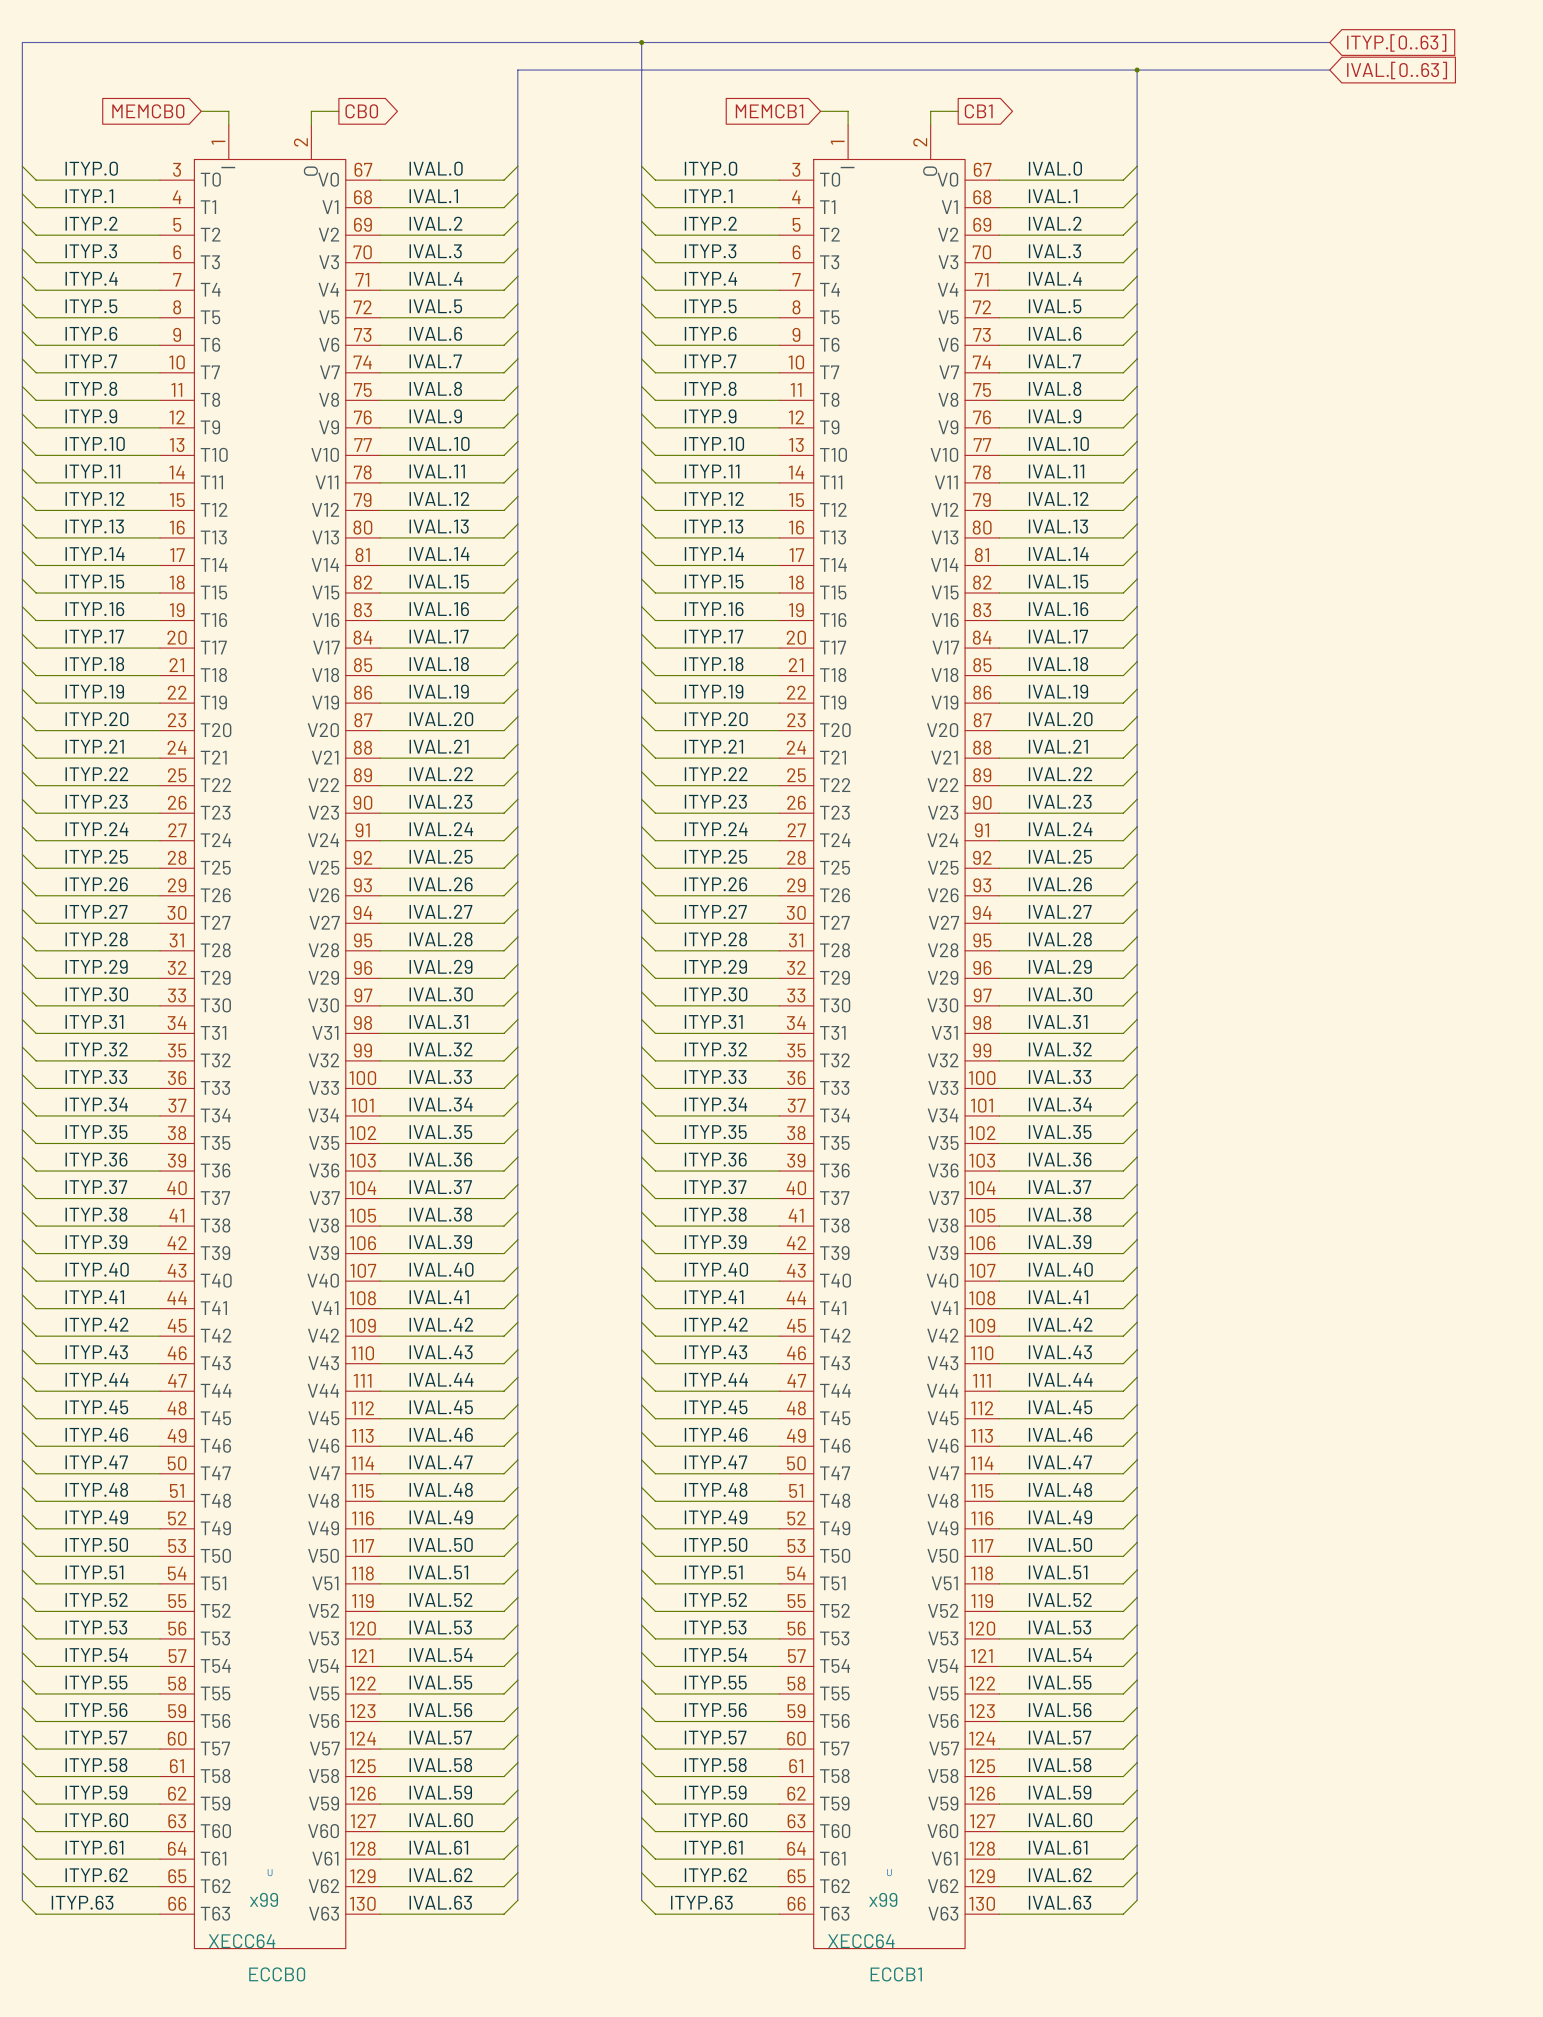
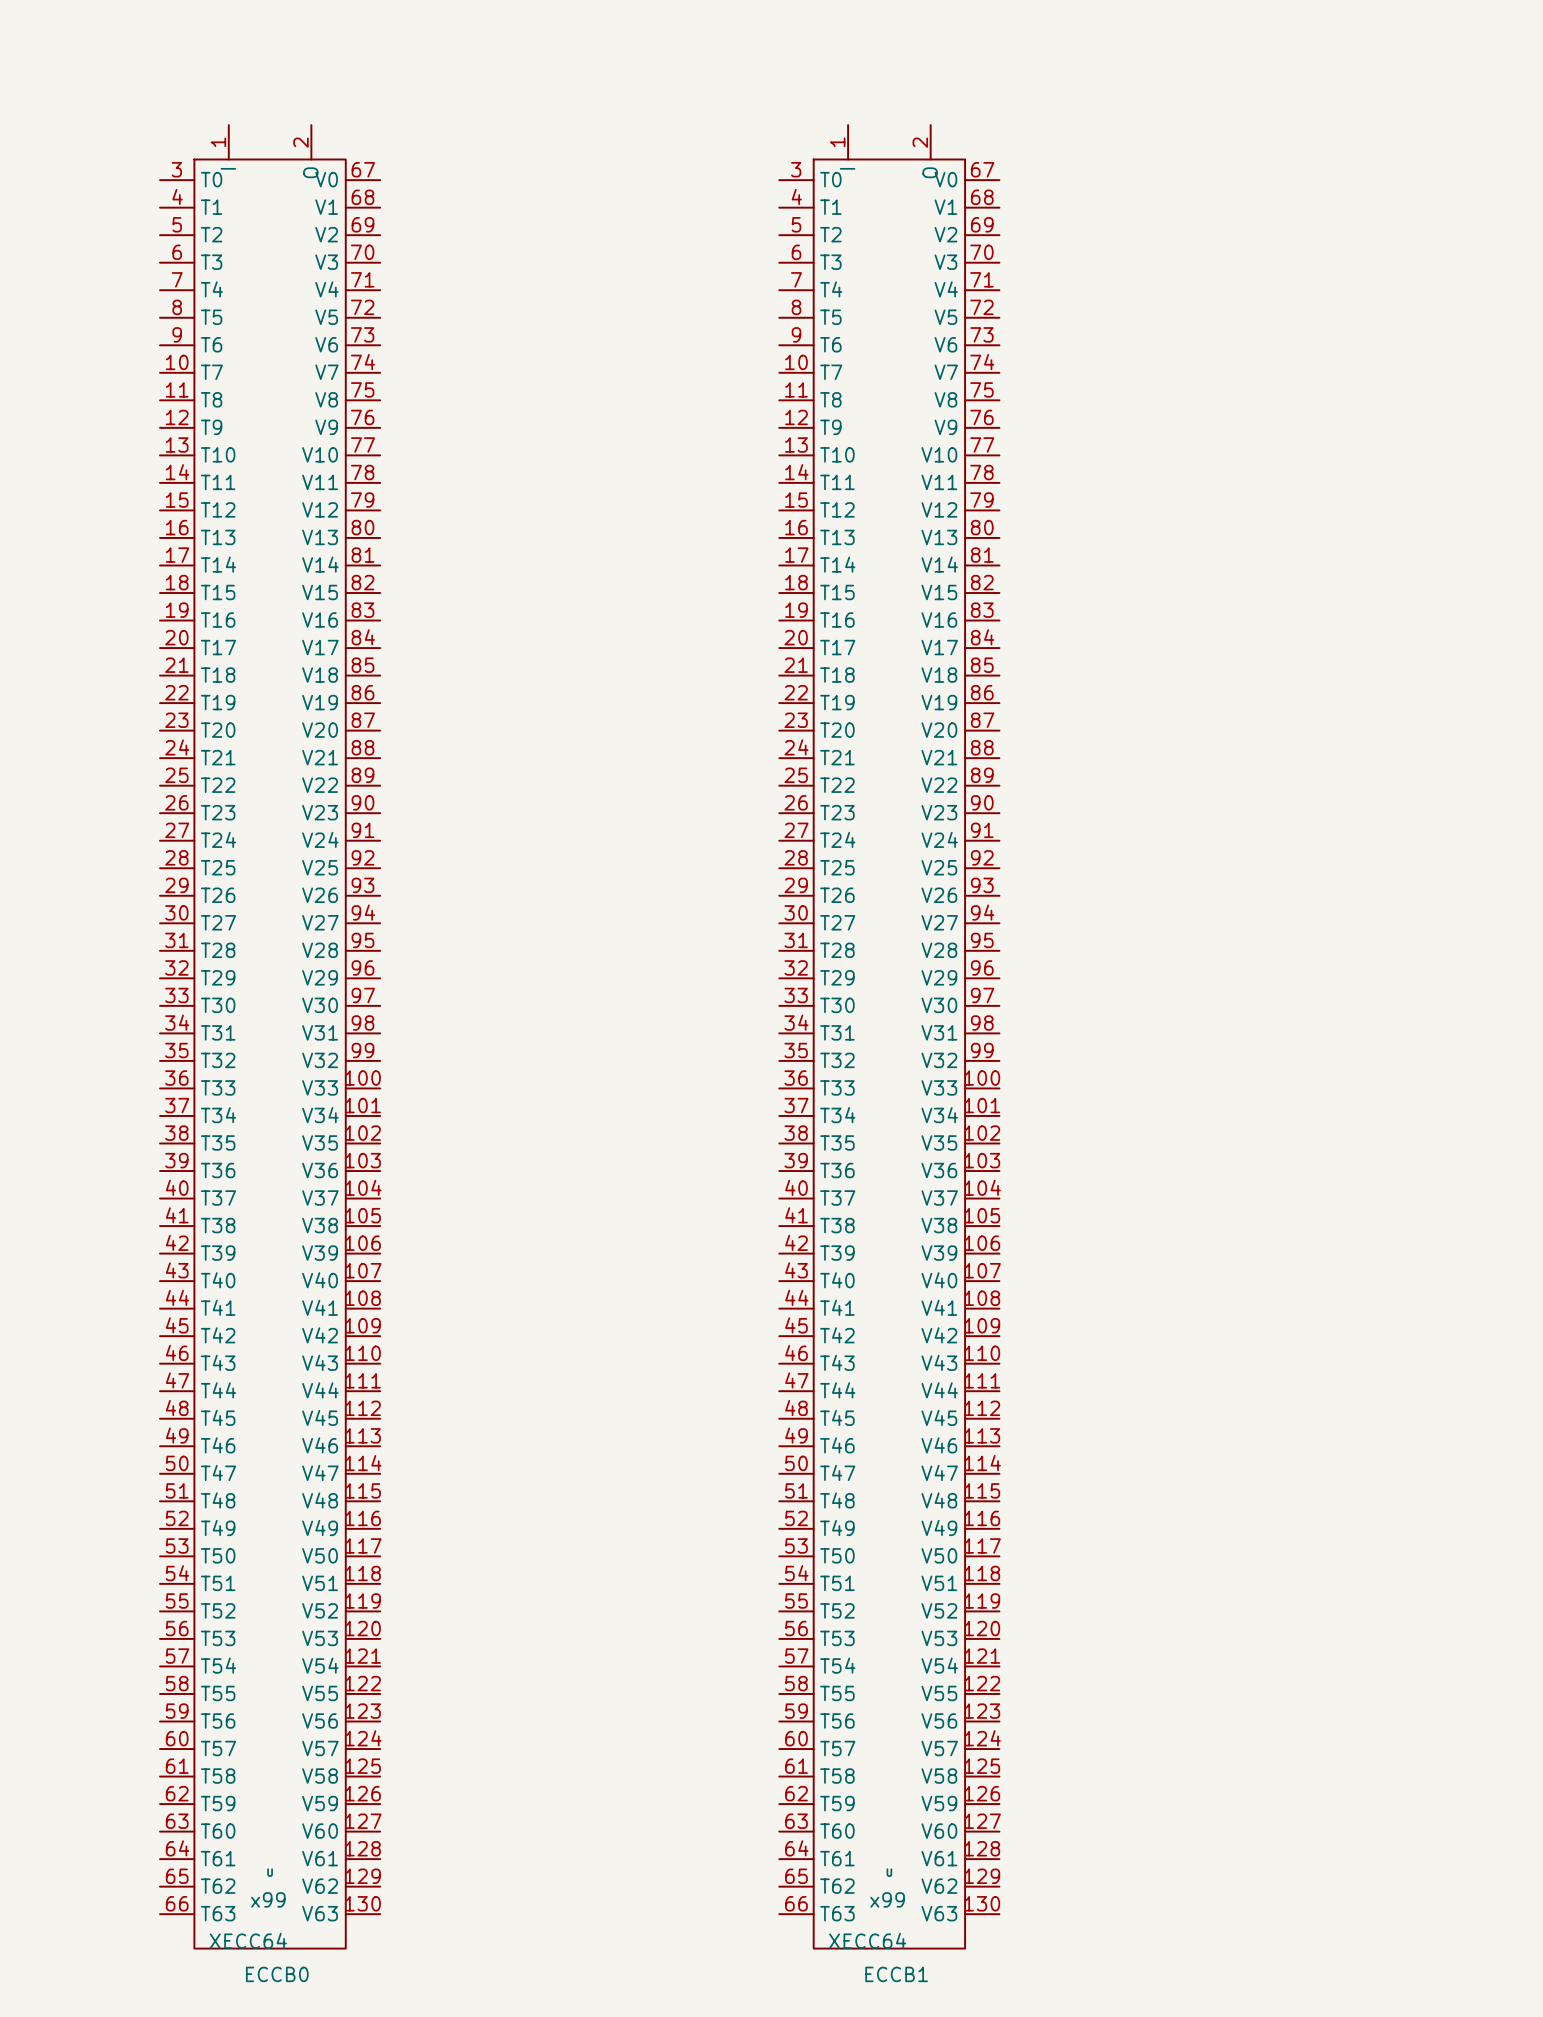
bus: (641, 42) (641, 1900) -> none
junction: (641, 42) -> none
bus: (1329, 42) (22, 42) (22, 1900) -> none
global label: ITYP.[0..63] (1396, 42) -> none
bus: (1137, 70) (1137, 1900) -> none
junction: (1137, 70) -> none
bus: (1329, 70) (517, 70) (517, 1900) -> none
global label: IVAL.[0..63] (1397, 70) -> none
global label: MEMCB0 (148, 111) -> none
wire: (201, 111) (228, 111) (228, 125) -> none
wire: (338, 111) (311, 111) (311, 125) -> none
global label: CB0 (361, 111) -> none
global label: MEMCB1 (769, 111) -> none
wire: (820, 111) (848, 111) (848, 125) -> none
wire: (958, 111) (930, 111) (930, 125) -> none
global label: CB1 (978, 111) -> none
wire: (22, 166) (36, 180) (159, 180) -> none
wire: (517, 166) (504, 180) (380, 180) -> none
wire: (641, 166) (655, 180) (779, 180) -> none
wire: (1137, 166) (1123, 180) (999, 180) -> none
label: ITYP.0 (91, 168) -> none
label: IVAL.0 (436, 168) -> none
label: ITYP.0 (711, 168) -> none
label: IVAL.0 (1055, 168) -> none
wire: (22, 193) (36, 207) (159, 207) -> none
wire: (517, 193) (504, 207) (380, 207) -> none
wire: (641, 193) (655, 207) (779, 207) -> none
wire: (1137, 193) (1123, 207) (999, 207) -> none
label: ITYP.1 (89, 196) -> none
label: IVAL.1 (433, 196) -> none
label: ITYP.1 (708, 196) -> none
label: IVAL.1 (1053, 196) -> none
wire: (22, 221) (36, 235) (159, 235) -> none
wire: (517, 221) (504, 235) (380, 235) -> none
wire: (641, 221) (655, 235) (779, 235) -> none
wire: (1137, 221) (1123, 235) (999, 235) -> none
label: ITYP.2 (91, 223) -> none
label: IVAL.2 (435, 223) -> none
label: ITYP.2 (710, 223) -> none
label: IVAL.2 (1055, 223) -> none
wire: (22, 248) (36, 262) (159, 262) -> none
wire: (517, 248) (504, 262) (380, 262) -> none
wire: (641, 248) (655, 262) (779, 262) -> none
wire: (1137, 248) (1123, 262) (999, 262) -> none
label: ITYP.3 (91, 251) -> none
label: IVAL.3 (435, 251) -> none
label: ITYP.3 (710, 251) -> none
label: IVAL.3 (1054, 251) -> none
wire: (22, 276) (36, 290) (159, 290) -> none
wire: (517, 276) (504, 290) (380, 290) -> none
wire: (641, 276) (655, 290) (779, 290) -> none
wire: (1137, 276) (1123, 290) (999, 290) -> none
label: ITYP.4 (91, 278) -> none
label: IVAL.4 (436, 278) -> none
label: ITYP.4 (710, 278) -> none
label: IVAL.4 (1055, 278) -> none
wire: (22, 304) (36, 317) (159, 317) -> none
wire: (517, 304) (504, 317) (380, 317) -> none
wire: (641, 304) (655, 317) (779, 317) -> none
wire: (1137, 304) (1123, 317) (999, 317) -> none
label: ITYP.5 (91, 306) -> none
label: IVAL.5 (435, 306) -> none
label: ITYP.5 (710, 306) -> none
label: IVAL.5 (1055, 306) -> none
wire: (22, 331) (36, 345) (159, 345) -> none
wire: (517, 331) (504, 345) (380, 345) -> none
wire: (641, 331) (655, 345) (779, 345) -> none
wire: (1137, 331) (1123, 345) (999, 345) -> none
label: ITYP.6 (91, 333) -> none
label: IVAL.6 (435, 333) -> none
label: ITYP.6 (710, 333) -> none
label: IVAL.6 (1055, 333) -> none
wire: (22, 359) (36, 372) (159, 372) -> none
wire: (517, 359) (504, 372) (380, 372) -> none
wire: (641, 359) (655, 372) (779, 372) -> none
wire: (1137, 359) (1123, 372) (999, 372) -> none
label: ITYP.7 (91, 361) -> none
label: IVAL.7 (435, 361) -> none
label: ITYP.7 (710, 361) -> none
label: IVAL.7 (1054, 361) -> none
wire: (22, 386) (36, 400) (159, 400) -> none
wire: (517, 386) (504, 400) (380, 400) -> none
wire: (641, 386) (655, 400) (779, 400) -> none
wire: (1137, 386) (1123, 400) (999, 400) -> none
label: ITYP.8 (91, 388) -> none
label: IVAL.8 (435, 388) -> none
label: ITYP.8 (710, 388) -> none
label: IVAL.8 (1055, 388) -> none
wire: (22, 414) (36, 427) (159, 427) -> none
wire: (517, 414) (504, 427) (380, 427) -> none
wire: (641, 414) (655, 427) (779, 427) -> none
wire: (1137, 414) (1123, 427) (999, 427) -> none
label: ITYP.9 (91, 416) -> none
label: IVAL.9 (435, 416) -> none
label: ITYP.9 (710, 416) -> none
label: IVAL.9 (1055, 416) -> none
wire: (22, 441) (36, 455) (159, 455) -> none
wire: (517, 441) (504, 455) (380, 455) -> none
wire: (641, 441) (655, 455) (779, 455) -> none
wire: (1137, 441) (1123, 455) (999, 455) -> none
label: ITYP.10 (95, 443) -> none
label: IVAL.10 (439, 443) -> none
label: ITYP.10 (714, 443) -> none
label: IVAL.10 (1058, 443) -> none
wire: (22, 469) (36, 482) (159, 482) -> none
wire: (517, 469) (504, 482) (380, 482) -> none
wire: (641, 469) (655, 482) (779, 482) -> none
wire: (1137, 469) (1123, 482) (999, 482) -> none
label: ITYP.11 (92, 471) -> none
label: IVAL.11 (437, 471) -> none
label: ITYP.11 (712, 471) -> none
label: IVAL.11 (1056, 471) -> none
wire: (22, 496) (36, 510) (159, 510) -> none
wire: (517, 496) (504, 510) (380, 510) -> none
wire: (641, 496) (655, 510) (779, 510) -> none
wire: (1137, 496) (1123, 510) (999, 510) -> none
label: ITYP.12 (94, 498) -> none
label: IVAL.12 (439, 498) -> none
label: ITYP.12 (714, 498) -> none
label: IVAL.12 (1058, 498) -> none
wire: (22, 524) (36, 537) (159, 537) -> none
wire: (517, 524) (504, 537) (380, 537) -> none
wire: (641, 524) (655, 537) (779, 537) -> none
wire: (1137, 524) (1123, 537) (999, 537) -> none
label: ITYP.13 (94, 526) -> none
label: IVAL.13 (439, 526) -> none
label: ITYP.13 (714, 526) -> none
label: IVAL.13 (1058, 526) -> none
wire: (22, 551) (36, 565) (159, 565) -> none
wire: (517, 551) (504, 565) (380, 565) -> none
wire: (641, 551) (655, 565) (779, 565) -> none
wire: (1137, 551) (1123, 565) (999, 565) -> none
label: ITYP.14 (95, 554) -> none
label: IVAL.14 (439, 554) -> none
label: ITYP.14 (714, 554) -> none
label: IVAL.14 (1058, 554) -> none
wire: (22, 579) (36, 593) (159, 593) -> none
wire: (517, 579) (504, 593) (380, 593) -> none
wire: (641, 579) (655, 593) (779, 593) -> none
wire: (1137, 579) (1123, 593) (999, 593) -> none
label: ITYP.15 (94, 581) -> none
label: IVAL.15 (439, 581) -> none
label: ITYP.15 (714, 581) -> none
label: IVAL.15 (1058, 581) -> none
wire: (22, 606) (36, 620) (159, 620) -> none
wire: (517, 606) (504, 620) (380, 620) -> none
wire: (641, 606) (655, 620) (779, 620) -> none
wire: (1137, 606) (1123, 620) (999, 620) -> none
label: ITYP.16 (94, 609) -> none
label: IVAL.16 (439, 609) -> none
label: ITYP.16 (714, 609) -> none
label: IVAL.16 (1058, 609) -> none
wire: (22, 634) (36, 648) (159, 648) -> none
wire: (517, 634) (504, 648) (380, 648) -> none
wire: (641, 634) (655, 648) (779, 648) -> none
wire: (1137, 634) (1123, 648) (999, 648) -> none
label: ITYP.17 (94, 636) -> none
label: IVAL.17 (439, 636) -> none
label: ITYP.17 (714, 636) -> none
label: IVAL.17 (1058, 636) -> none
wire: (22, 661) (36, 675) (159, 675) -> none
wire: (517, 661) (504, 675) (380, 675) -> none
wire: (641, 661) (655, 675) (779, 675) -> none
wire: (1137, 661) (1123, 675) (999, 675) -> none
label: ITYP.18 (94, 664) -> none
label: IVAL.18 (439, 664) -> none
label: ITYP.18 (714, 664) -> none
label: IVAL.18 (1058, 664) -> none
wire: (22, 689) (36, 703) (159, 703) -> none
wire: (517, 689) (504, 703) (380, 703) -> none
wire: (641, 689) (655, 703) (779, 703) -> none
wire: (1137, 689) (1123, 703) (999, 703) -> none
label: ITYP.19 (94, 691) -> none
label: IVAL.19 (439, 691) -> none
label: ITYP.19 (714, 691) -> none
label: IVAL.19 (1058, 691) -> none
wire: (22, 716) (36, 730) (159, 730) -> none
wire: (517, 716) (504, 730) (380, 730) -> none
wire: (641, 716) (655, 730) (779, 730) -> none
wire: (1137, 716) (1123, 730) (999, 730) -> none
label: ITYP.20 (96, 719) -> none
label: IVAL.20 (441, 719) -> none
label: ITYP.20 (716, 719) -> none
label: IVAL.20 (1060, 719) -> none
wire: (22, 744) (36, 758) (159, 758) -> none
wire: (517, 744) (504, 758) (380, 758) -> none
wire: (641, 744) (655, 758) (779, 758) -> none
wire: (1137, 744) (1123, 758) (999, 758) -> none
label: ITYP.21 (94, 746) -> none
label: IVAL.21 (439, 746) -> none
label: ITYP.21 (713, 746) -> none
label: IVAL.21 (1058, 746) -> none
wire: (22, 771) (36, 785) (159, 785) -> none
wire: (517, 771) (504, 785) (380, 785) -> none
wire: (641, 771) (655, 785) (779, 785) -> none
wire: (1137, 771) (1123, 785) (999, 785) -> none
label: ITYP.22 (96, 774) -> none
label: IVAL.22 (441, 774) -> none
label: ITYP.22 (716, 774) -> none
label: IVAL.22 (1060, 774) -> none
wire: (22, 799) (36, 813) (159, 813) -> none
wire: (517, 799) (504, 813) (380, 813) -> none
wire: (641, 799) (655, 813) (779, 813) -> none
wire: (1137, 799) (1123, 813) (999, 813) -> none
label: ITYP.23 (96, 801) -> none
label: IVAL.23 (440, 801) -> none
label: ITYP.23 (715, 801) -> none
label: IVAL.23 (1060, 801) -> none
wire: (22, 826) (36, 840) (159, 840) -> none
wire: (517, 826) (504, 840) (380, 840) -> none
wire: (641, 826) (655, 840) (779, 840) -> none
wire: (1137, 826) (1123, 840) (999, 840) -> none
label: ITYP.24 (96, 829) -> none
label: IVAL.24 (441, 829) -> none
label: ITYP.24 (716, 829) -> none
label: IVAL.24 (1060, 829) -> none
wire: (22, 854) (36, 868) (159, 868) -> none
wire: (517, 854) (504, 868) (380, 868) -> none
wire: (641, 854) (655, 868) (779, 868) -> none
wire: (1137, 854) (1123, 868) (999, 868) -> none
label: ITYP.25 (96, 856) -> none
label: IVAL.25 (441, 856) -> none
label: ITYP.25 (715, 856) -> none
label: IVAL.25 (1060, 856) -> none
wire: (22, 882) (36, 895) (159, 895) -> none
wire: (517, 882) (504, 895) (380, 895) -> none
wire: (641, 882) (655, 895) (779, 895) -> none
wire: (1137, 882) (1123, 895) (999, 895) -> none
label: ITYP.26 (96, 884) -> none
label: IVAL.26 (441, 884) -> none
label: ITYP.26 (715, 884) -> none
label: IVAL.26 (1060, 884) -> none
wire: (22, 909) (36, 923) (159, 923) -> none
wire: (517, 909) (504, 923) (380, 923) -> none
wire: (641, 909) (655, 923) (779, 923) -> none
wire: (1137, 909) (1123, 923) (999, 923) -> none
label: ITYP.27 (96, 911) -> none
label: IVAL.27 (440, 911) -> none
label: ITYP.27 (715, 911) -> none
label: IVAL.27 (1060, 911) -> none
wire: (22, 937) (36, 950) (159, 950) -> none
wire: (517, 937) (504, 950) (380, 950) -> none
wire: (641, 937) (655, 950) (779, 950) -> none
wire: (1137, 937) (1123, 950) (999, 950) -> none
label: ITYP.28 (96, 939) -> none
label: IVAL.28 (441, 939) -> none
label: ITYP.28 (715, 939) -> none
label: IVAL.28 (1060, 939) -> none
wire: (22, 964) (36, 978) (159, 978) -> none
wire: (517, 964) (504, 978) (380, 978) -> none
wire: (641, 964) (655, 978) (779, 978) -> none
wire: (1137, 964) (1123, 978) (999, 978) -> none
label: ITYP.29 (96, 966) -> none
label: IVAL.29 (441, 966) -> none
label: ITYP.29 (715, 966) -> none
label: IVAL.29 (1060, 966) -> none
wire: (22, 992) (36, 1005) (159, 1005) -> none
wire: (517, 992) (504, 1005) (380, 1005) -> none
wire: (641, 992) (655, 1005) (779, 1005) -> none
wire: (1137, 992) (1123, 1005) (999, 1005) -> none
label: ITYP.30 (96, 994) -> none
label: IVAL.30 (441, 994) -> none
label: ITYP.30 (716, 994) -> none
label: IVAL.30 (1060, 994) -> none
wire: (22, 1019) (36, 1033) (159, 1033) -> none
wire: (517, 1019) (504, 1033) (380, 1033) -> none
wire: (641, 1019) (655, 1033) (779, 1033) -> none
wire: (1137, 1019) (1123, 1033) (999, 1033) -> none
label: ITYP.31 (94, 1022) -> none
label: IVAL.31 (438, 1022) -> none
label: ITYP.31 (713, 1022) -> none
label: IVAL.31 (1058, 1022) -> none
wire: (22, 1047) (36, 1060) (159, 1060) -> none
wire: (517, 1047) (504, 1060) (380, 1060) -> none
wire: (641, 1047) (655, 1060) (779, 1060) -> none
wire: (1137, 1047) (1123, 1060) (999, 1060) -> none
label: ITYP.32 (96, 1049) -> none
label: IVAL.32 (441, 1049) -> none
label: ITYP.32 (715, 1049) -> none
label: IVAL.32 (1060, 1049) -> none
wire: (22, 1074) (36, 1088) (159, 1088) -> none
wire: (517, 1074) (504, 1088) (380, 1088) -> none
wire: (641, 1074) (655, 1088) (779, 1088) -> none
wire: (1137, 1074) (1123, 1088) (999, 1088) -> none
label: ITYP.33 (96, 1077) -> none
label: IVAL.33 (440, 1077) -> none
label: ITYP.33 (715, 1077) -> none
label: IVAL.33 (1060, 1077) -> none
wire: (22, 1102) (36, 1115) (159, 1115) -> none
wire: (517, 1102) (504, 1115) (380, 1115) -> none
wire: (641, 1102) (655, 1115) (779, 1115) -> none
wire: (1137, 1102) (1123, 1115) (999, 1115) -> none
label: ITYP.34 (96, 1104) -> none
label: IVAL.34 (441, 1104) -> none
label: ITYP.34 (716, 1104) -> none
label: IVAL.34 (1060, 1104) -> none
wire: (22, 1129) (36, 1143) (159, 1143) -> none
wire: (517, 1129) (504, 1143) (380, 1143) -> none
wire: (641, 1129) (655, 1143) (779, 1143) -> none
wire: (1137, 1129) (1123, 1143) (999, 1143) -> none
label: ITYP.35 (96, 1132) -> none
label: IVAL.35 (440, 1132) -> none
label: ITYP.35 (715, 1132) -> none
label: IVAL.35 (1060, 1132) -> none
wire: (22, 1157) (36, 1171) (159, 1171) -> none
wire: (517, 1157) (504, 1171) (380, 1171) -> none
wire: (641, 1157) (655, 1171) (779, 1171) -> none
wire: (1137, 1157) (1123, 1171) (999, 1171) -> none
label: ITYP.36 (96, 1159) -> none
label: IVAL.36 (440, 1159) -> none
label: ITYP.36 (715, 1159) -> none
label: IVAL.36 (1060, 1159) -> none
wire: (22, 1184) (36, 1198) (159, 1198) -> none
wire: (517, 1184) (504, 1198) (380, 1198) -> none
wire: (641, 1184) (655, 1198) (779, 1198) -> none
wire: (1137, 1184) (1123, 1198) (999, 1198) -> none
label: ITYP.37 (96, 1187) -> none
label: IVAL.37 (440, 1187) -> none
label: ITYP.37 (715, 1187) -> none
label: IVAL.37 (1060, 1187) -> none
wire: (22, 1212) (36, 1226) (159, 1226) -> none
wire: (517, 1212) (504, 1226) (380, 1226) -> none
wire: (641, 1212) (655, 1226) (779, 1226) -> none
wire: (1137, 1212) (1123, 1226) (999, 1226) -> none
label: ITYP.38 (96, 1214) -> none
label: IVAL.38 (440, 1214) -> none
label: ITYP.38 (715, 1214) -> none
label: IVAL.38 (1060, 1214) -> none
wire: (22, 1239) (36, 1253) (159, 1253) -> none
wire: (517, 1239) (504, 1253) (380, 1253) -> none
wire: (641, 1239) (655, 1253) (779, 1253) -> none
wire: (1137, 1239) (1123, 1253) (999, 1253) -> none
label: ITYP.39 (96, 1242) -> none
label: IVAL.39 (440, 1242) -> none
label: ITYP.39 (715, 1242) -> none
label: IVAL.39 (1060, 1242) -> none
wire: (22, 1267) (36, 1281) (159, 1281) -> none
wire: (517, 1267) (504, 1281) (380, 1281) -> none
wire: (641, 1267) (655, 1281) (779, 1281) -> none
wire: (1137, 1267) (1123, 1281) (999, 1281) -> none
label: ITYP.40 (97, 1269) -> none
label: IVAL.40 (441, 1269) -> none
label: ITYP.40 (716, 1269) -> none
label: IVAL.40 (1060, 1269) -> none
wire: (22, 1294) (36, 1308) (159, 1308) -> none
wire: (517, 1294) (504, 1308) (380, 1308) -> none
wire: (641, 1294) (655, 1308) (779, 1308) -> none
wire: (1137, 1294) (1123, 1308) (999, 1308) -> none
label: ITYP.41 (94, 1297) -> none
label: IVAL.41 (439, 1297) -> none
label: ITYP.41 (714, 1297) -> none
label: IVAL.41 (1058, 1297) -> none
wire: (22, 1322) (36, 1336) (159, 1336) -> none
wire: (517, 1322) (504, 1336) (380, 1336) -> none
wire: (641, 1322) (655, 1336) (779, 1336) -> none
wire: (1137, 1322) (1123, 1336) (999, 1336) -> none
label: ITYP.42 (96, 1324) -> none
label: IVAL.42 (441, 1324) -> none
label: ITYP.42 (716, 1324) -> none
label: IVAL.42 (1060, 1324) -> none
wire: (22, 1349) (36, 1363) (159, 1363) -> none
wire: (517, 1349) (504, 1363) (380, 1363) -> none
wire: (641, 1349) (655, 1363) (779, 1363) -> none
wire: (1137, 1349) (1123, 1363) (999, 1363) -> none
label: ITYP.43 (96, 1352) -> none
label: IVAL.43 (441, 1352) -> none
label: ITYP.43 (715, 1352) -> none
label: IVAL.43 (1060, 1352) -> none
wire: (22, 1377) (36, 1391) (159, 1391) -> none
wire: (517, 1377) (504, 1391) (380, 1391) -> none
wire: (641, 1377) (655, 1391) (779, 1391) -> none
wire: (1137, 1377) (1123, 1391) (999, 1391) -> none
label: ITYP.44 (97, 1379) -> none
label: IVAL.44 (441, 1379) -> none
label: ITYP.44 (716, 1379) -> none
label: IVAL.44 (1060, 1379) -> none
wire: (22, 1404) (36, 1418) (159, 1418) -> none
wire: (517, 1404) (504, 1418) (380, 1418) -> none
wire: (641, 1404) (655, 1418) (779, 1418) -> none
wire: (1137, 1404) (1123, 1418) (999, 1418) -> none
label: ITYP.45 (96, 1407) -> none
label: IVAL.45 (441, 1407) -> none
label: ITYP.45 (716, 1407) -> none
label: IVAL.45 (1060, 1407) -> none
wire: (22, 1432) (36, 1446) (159, 1446) -> none
wire: (517, 1432) (504, 1446) (380, 1446) -> none
wire: (641, 1432) (655, 1446) (779, 1446) -> none
wire: (1137, 1432) (1123, 1446) (999, 1446) -> none
label: ITYP.46 (96, 1434) -> none
label: IVAL.46 (441, 1434) -> none
label: ITYP.46 (716, 1434) -> none
label: IVAL.46 (1060, 1434) -> none
wire: (22, 1460) (36, 1473) (159, 1473) -> none
wire: (517, 1460) (504, 1473) (380, 1473) -> none
wire: (641, 1460) (655, 1473) (779, 1473) -> none
wire: (1137, 1460) (1123, 1473) (999, 1473) -> none
label: ITYP.47 (96, 1462) -> none
label: IVAL.47 (441, 1462) -> none
label: ITYP.47 (715, 1462) -> none
label: IVAL.47 (1060, 1462) -> none
wire: (22, 1487) (36, 1501) (159, 1501) -> none
wire: (517, 1487) (504, 1501) (380, 1501) -> none
wire: (641, 1487) (655, 1501) (779, 1501) -> none
wire: (1137, 1487) (1123, 1501) (999, 1501) -> none
label: ITYP.48 (96, 1489) -> none
label: IVAL.48 (441, 1489) -> none
label: ITYP.48 (716, 1489) -> none
label: IVAL.48 (1060, 1489) -> none
wire: (22, 1515) (36, 1528) (159, 1528) -> none
wire: (517, 1515) (504, 1528) (380, 1528) -> none
wire: (641, 1515) (655, 1528) (779, 1528) -> none
wire: (1137, 1515) (1123, 1528) (999, 1528) -> none
label: ITYP.49 (96, 1517) -> none
label: IVAL.49 (441, 1517) -> none
label: ITYP.49 (716, 1517) -> none
label: IVAL.49 (1060, 1517) -> none
wire: (22, 1542) (36, 1556) (159, 1556) -> none
wire: (517, 1542) (504, 1556) (380, 1556) -> none
wire: (641, 1542) (655, 1556) (779, 1556) -> none
wire: (1137, 1542) (1123, 1556) (999, 1556) -> none
label: ITYP.50 (96, 1544) -> none
label: IVAL.50 (441, 1544) -> none
label: ITYP.50 (716, 1544) -> none
label: IVAL.50 (1060, 1544) -> none
wire: (22, 1570) (36, 1583) (159, 1583) -> none
wire: (517, 1570) (504, 1583) (380, 1583) -> none
wire: (641, 1570) (655, 1583) (779, 1583) -> none
wire: (1137, 1570) (1123, 1583) (999, 1583) -> none
label: ITYP.51 (94, 1572) -> none
label: IVAL.51 (438, 1572) -> none
label: ITYP.51 (713, 1572) -> none
label: IVAL.51 (1058, 1572) -> none
wire: (22, 1597) (36, 1611) (159, 1611) -> none
wire: (517, 1597) (504, 1611) (380, 1611) -> none
wire: (641, 1597) (655, 1611) (779, 1611) -> none
wire: (1137, 1597) (1123, 1611) (999, 1611) -> none
label: ITYP.52 (96, 1599) -> none
label: IVAL.52 (441, 1599) -> none
label: ITYP.52 (715, 1599) -> none
label: IVAL.52 (1060, 1599) -> none
wire: (22, 1625) (36, 1638) (159, 1638) -> none
wire: (517, 1625) (504, 1638) (380, 1638) -> none
wire: (641, 1625) (655, 1638) (779, 1638) -> none
wire: (1137, 1625) (1123, 1638) (999, 1638) -> none
label: ITYP.53 (96, 1627) -> none
label: IVAL.53 (440, 1627) -> none
label: ITYP.53 (715, 1627) -> none
label: IVAL.53 (1060, 1627) -> none
wire: (22, 1652) (36, 1666) (159, 1666) -> none
wire: (517, 1652) (504, 1666) (380, 1666) -> none
wire: (641, 1652) (655, 1666) (779, 1666) -> none
wire: (1137, 1652) (1123, 1666) (999, 1666) -> none
label: ITYP.54 (96, 1655) -> none
label: IVAL.54 (441, 1655) -> none
label: ITYP.54 (716, 1655) -> none
label: IVAL.54 (1060, 1655) -> none
wire: (22, 1680) (36, 1693) (159, 1693) -> none
wire: (517, 1680) (504, 1693) (380, 1693) -> none
wire: (641, 1680) (655, 1693) (779, 1693) -> none
wire: (1137, 1680) (1123, 1693) (999, 1693) -> none
label: ITYP.55 (96, 1682) -> none
label: IVAL.55 (440, 1682) -> none
label: ITYP.55 (715, 1682) -> none
label: IVAL.55 (1060, 1682) -> none
wire: (22, 1707) (36, 1721) (159, 1721) -> none
wire: (517, 1707) (504, 1721) (380, 1721) -> none
wire: (641, 1707) (655, 1721) (779, 1721) -> none
wire: (1137, 1707) (1123, 1721) (999, 1721) -> none
label: ITYP.56 (96, 1710) -> none
label: IVAL.56 (440, 1710) -> none
label: ITYP.56 (715, 1710) -> none
label: IVAL.56 (1060, 1710) -> none
wire: (22, 1735) (36, 1749) (159, 1749) -> none
wire: (517, 1735) (504, 1749) (380, 1749) -> none
wire: (641, 1735) (655, 1749) (779, 1749) -> none
wire: (1137, 1735) (1123, 1749) (999, 1749) -> none
label: ITYP.57 (96, 1737) -> none
label: IVAL.57 (440, 1737) -> none
label: ITYP.57 (715, 1737) -> none
label: IVAL.57 (1060, 1737) -> none
wire: (22, 1762) (36, 1776) (159, 1776) -> none
wire: (517, 1762) (504, 1776) (380, 1776) -> none
wire: (641, 1762) (655, 1776) (779, 1776) -> none
wire: (1137, 1762) (1123, 1776) (999, 1776) -> none
label: ITYP.58 (96, 1765) -> none
label: IVAL.58 (440, 1765) -> none
label: ITYP.58 (715, 1765) -> none
label: IVAL.58 (1060, 1765) -> none
wire: (22, 1790) (36, 1804) (159, 1804) -> none
wire: (517, 1790) (504, 1804) (380, 1804) -> none
wire: (641, 1790) (655, 1804) (779, 1804) -> none
wire: (1137, 1790) (1123, 1804) (999, 1804) -> none
label: ITYP.59 (96, 1792) -> none
label: IVAL.59 (440, 1792) -> none
label: ITYP.59 (715, 1792) -> none
label: IVAL.59 (1060, 1792) -> none
wire: (22, 1817) (36, 1831) (159, 1831) -> none
wire: (517, 1817) (504, 1831) (380, 1831) -> none
wire: (641, 1817) (655, 1831) (779, 1831) -> none
wire: (1137, 1817) (1123, 1831) (999, 1831) -> none
label: ITYP.60 (96, 1820) -> none
label: IVAL.60 (441, 1820) -> none
label: ITYP.60 (716, 1820) -> none
label: IVAL.60 (1060, 1820) -> none
wire: (22, 1845) (36, 1859) (159, 1859) -> none
wire: (517, 1845) (504, 1859) (380, 1859) -> none
wire: (641, 1845) (655, 1859) (779, 1859) -> none
wire: (1137, 1845) (1123, 1859) (999, 1859) -> none
label: ITYP.61 (94, 1847) -> none
label: IVAL.61 (438, 1847) -> none
label: ITYP.61 (713, 1847) -> none
label: IVAL.61 (1058, 1847) -> none
wire: (22, 1872) (36, 1886) (159, 1886) -> none
wire: (517, 1872) (504, 1886) (380, 1886) -> none
wire: (641, 1872) (655, 1886) (779, 1886) -> none
wire: (1137, 1872) (1123, 1886) (999, 1886) -> none
label: ITYP.62 (96, 1875) -> none
label: IVAL.62 (441, 1875) -> none
label: ITYP.62 (715, 1875) -> none
label: IVAL.62 (1060, 1875) -> none
wire: (22, 1900) (36, 1914) (159, 1914) -> none
wire: (517, 1900) (504, 1914) (380, 1914) -> none
wire: (641, 1900) (655, 1914) (779, 1914) -> none
wire: (1137, 1900) (1123, 1914) (999, 1914) -> none
label: ITYP.63 (82, 1902) -> none
label: IVAL.63 (440, 1902) -> none
label: ITYP.63 (701, 1902) -> none
label: IVAL.63 (1060, 1902) -> none

